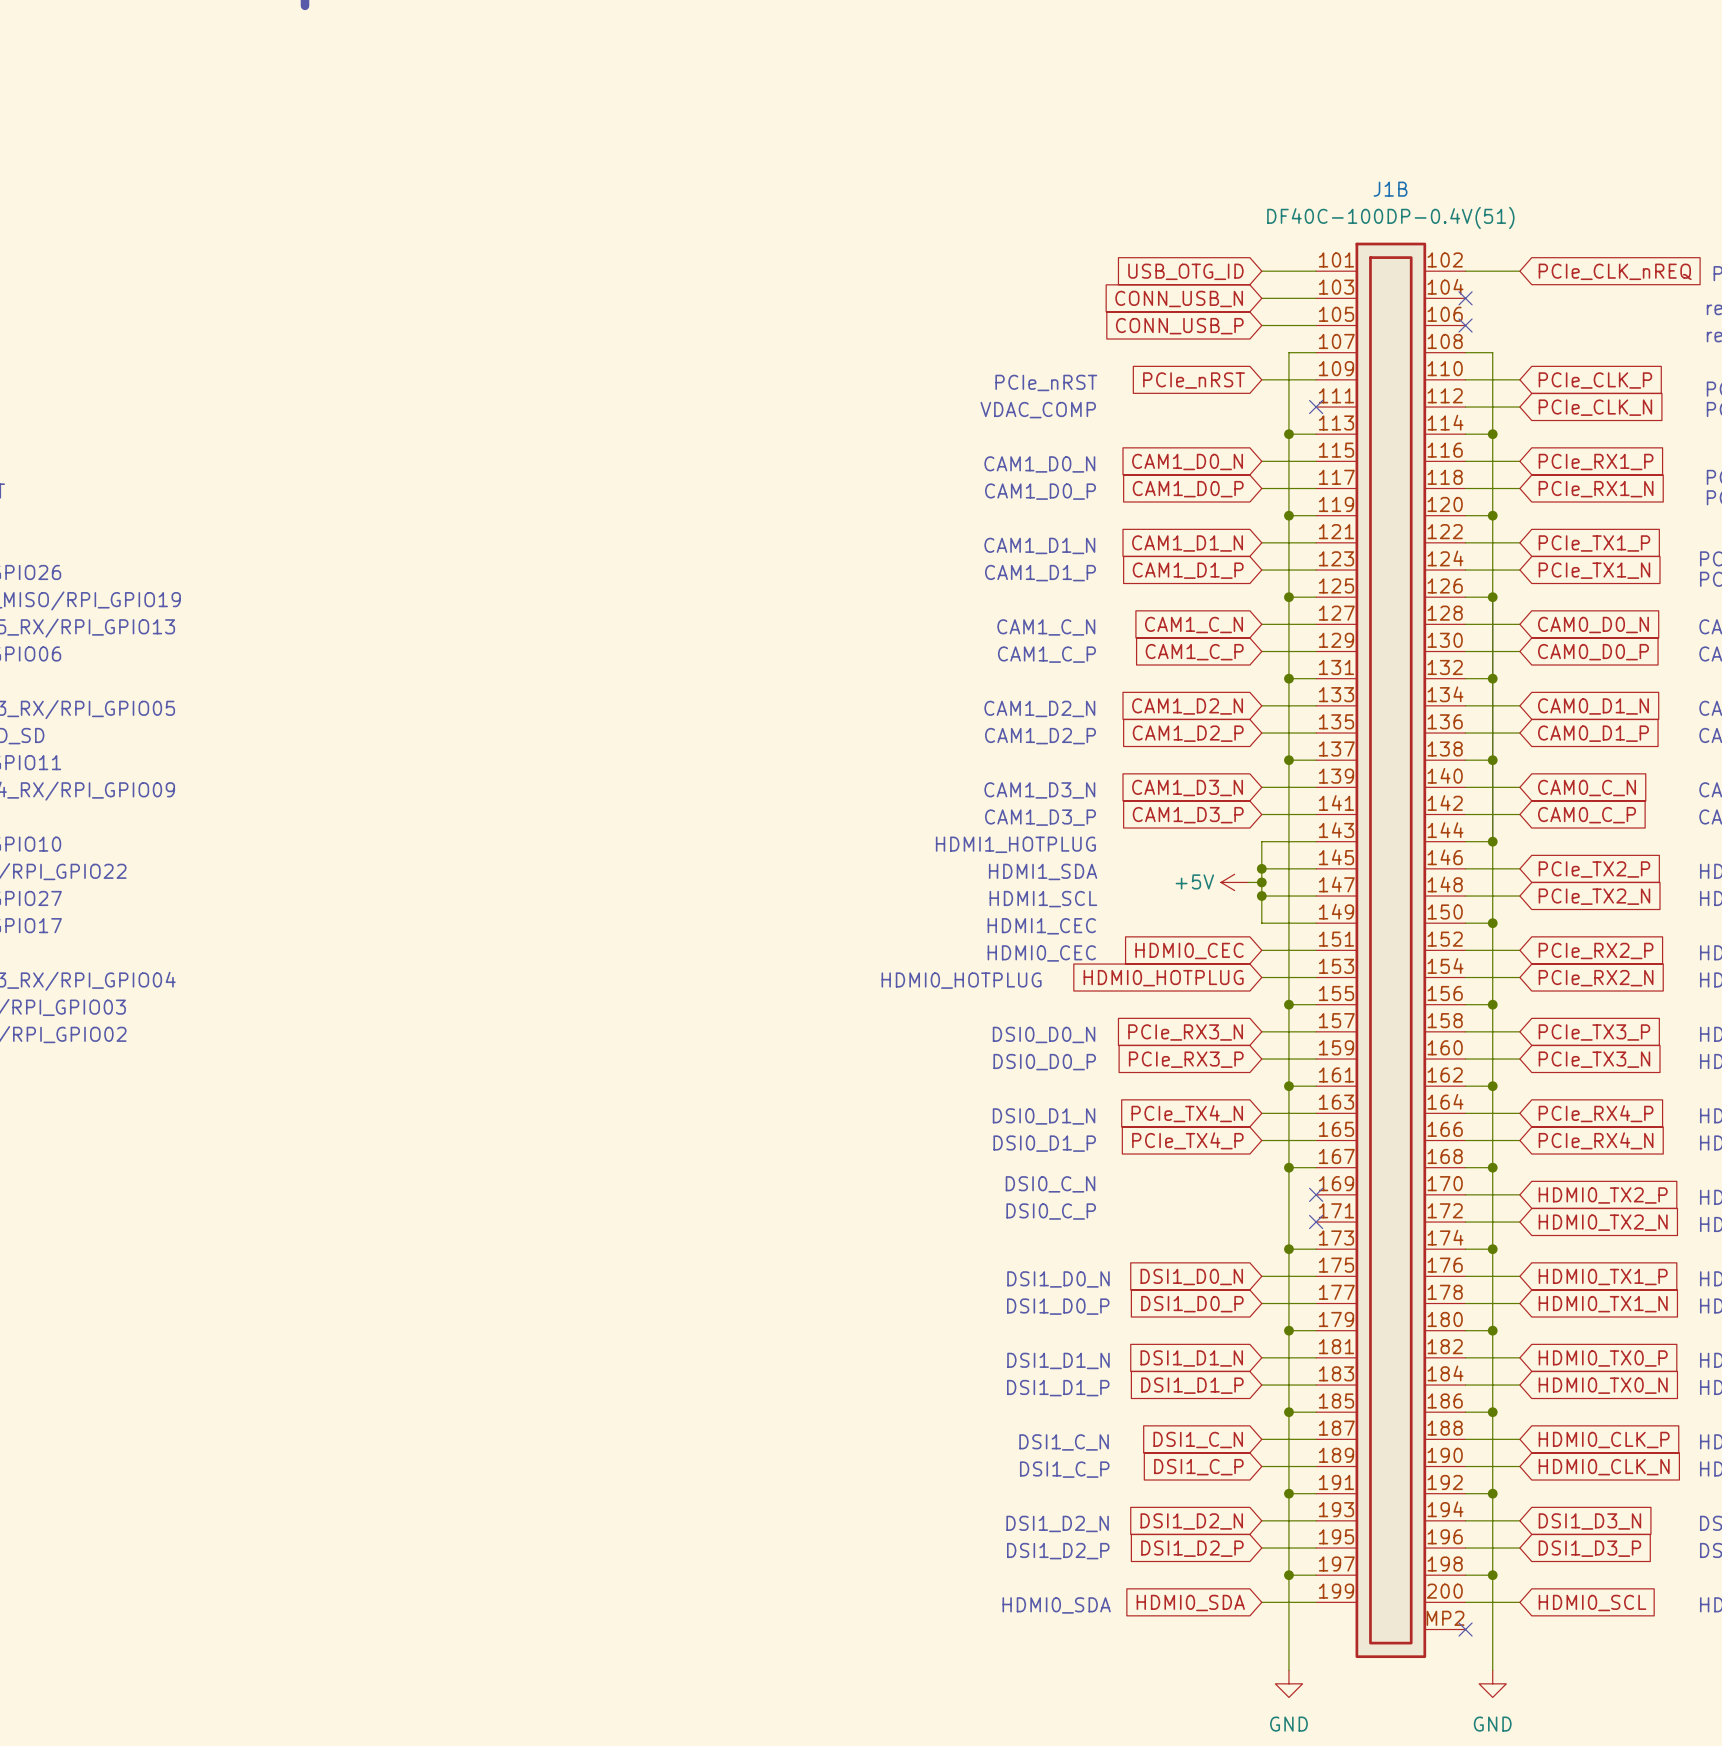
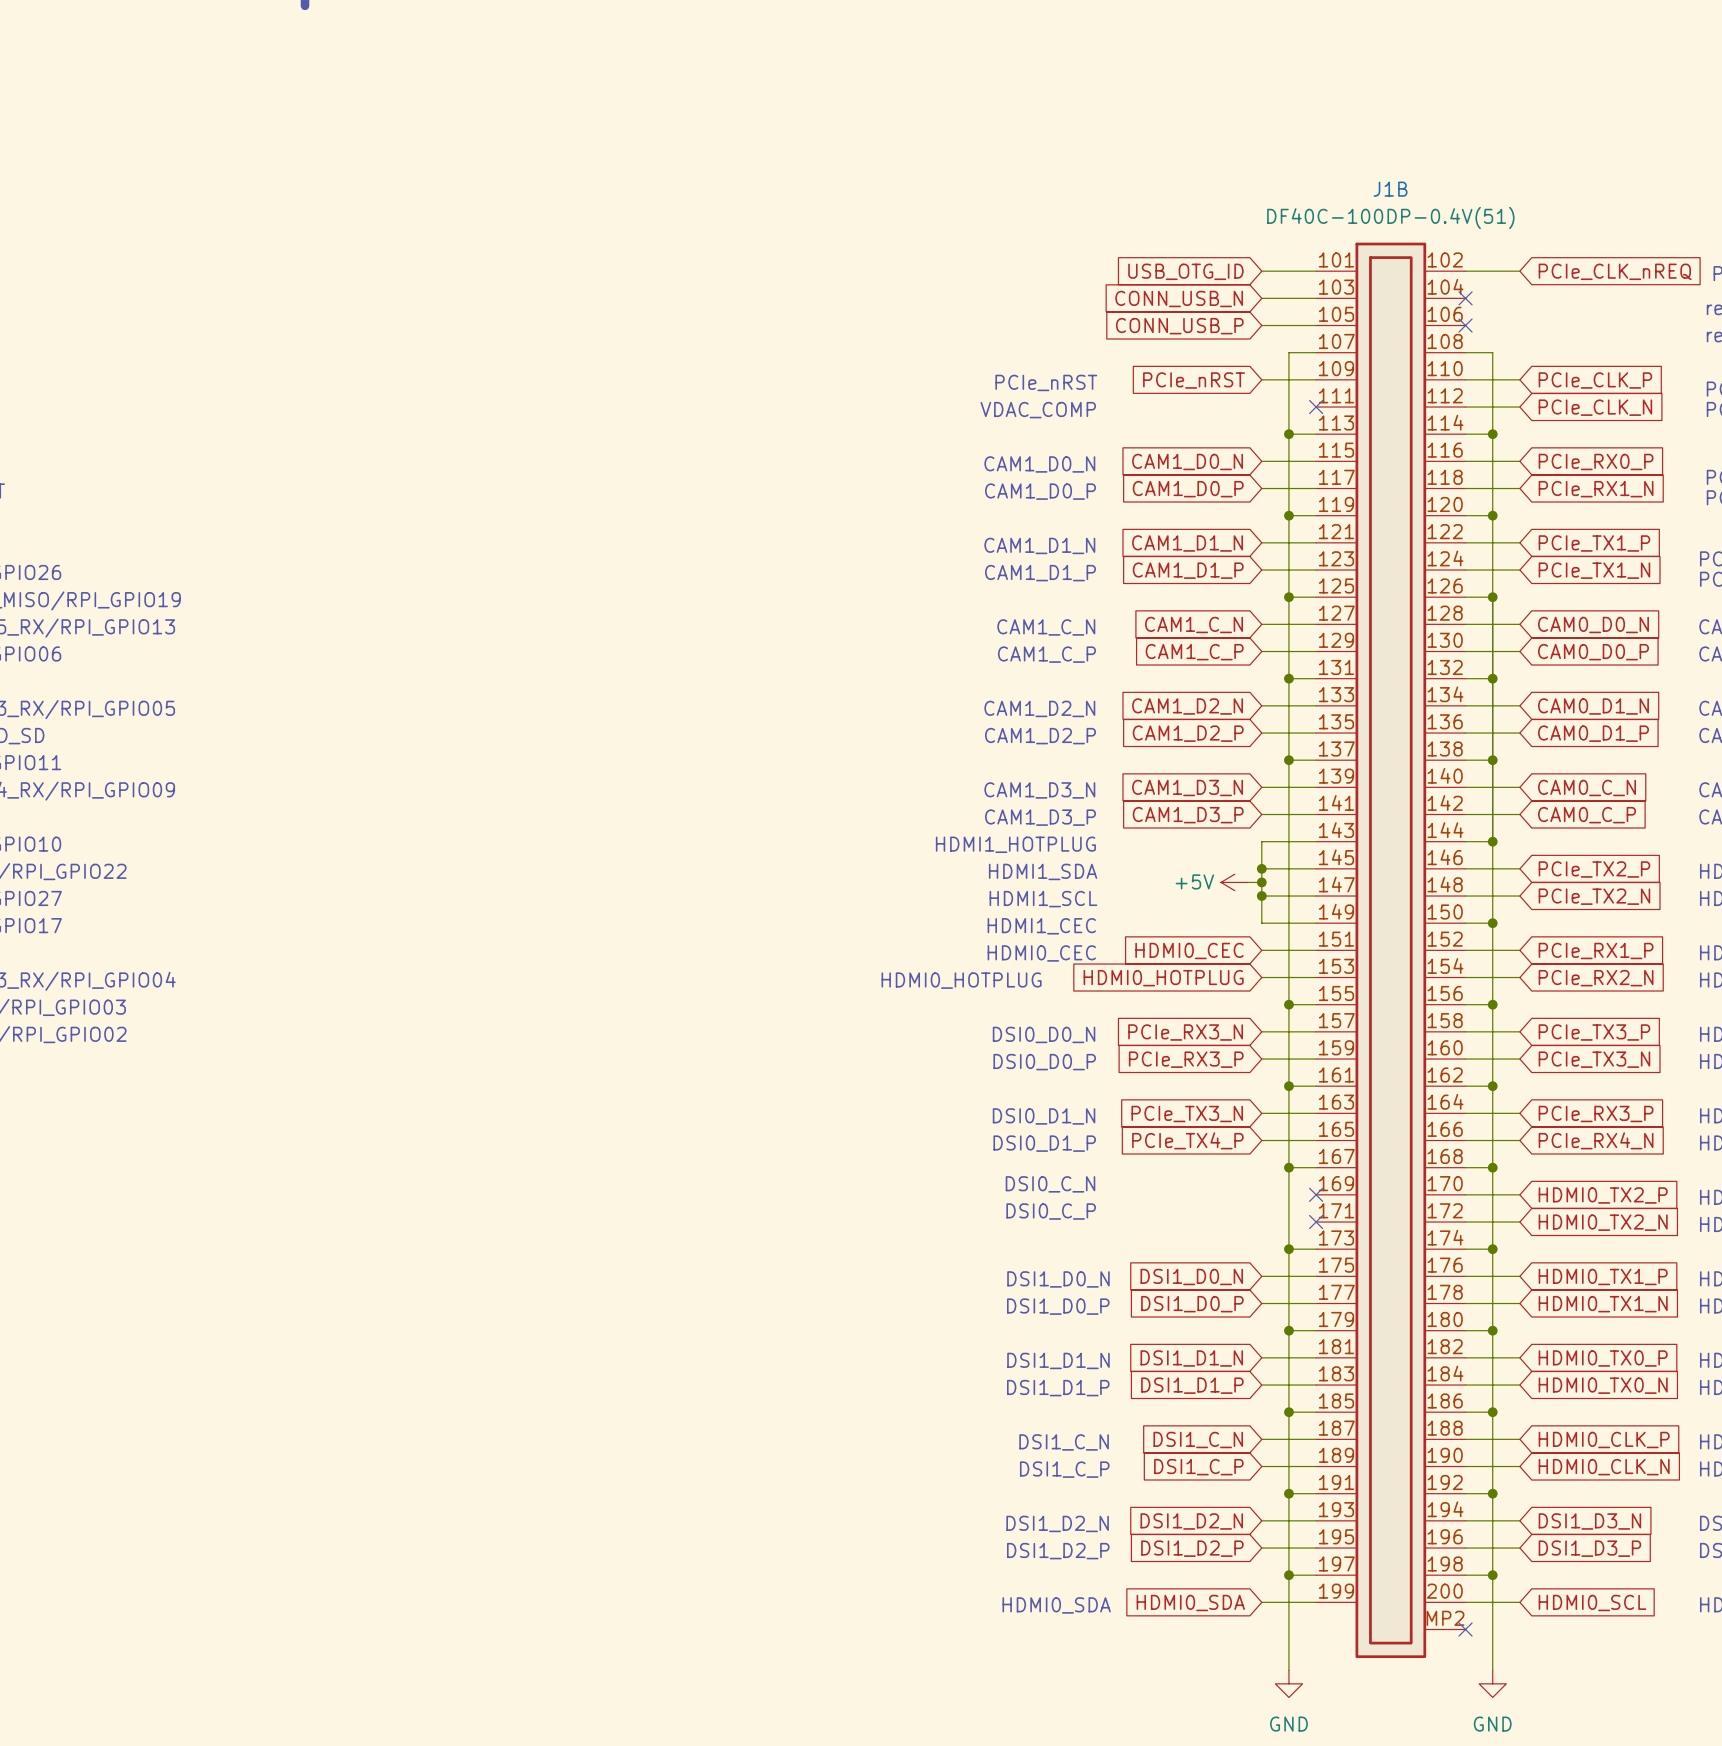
global label: PCIe_RX1_P (1596, 461) -> PCIe_RX0_P (1596, 461)
global label: PCIe_RX2_P (1596, 950) -> PCIe_RX1_P (1596, 950)
global label: PCIe_TX4_N (1187, 1113) -> PCIe_TX3_N (1187, 1114)
global label: PCIe_RX4_P (1596, 1113) -> PCIe_RX3_P (1596, 1114)

